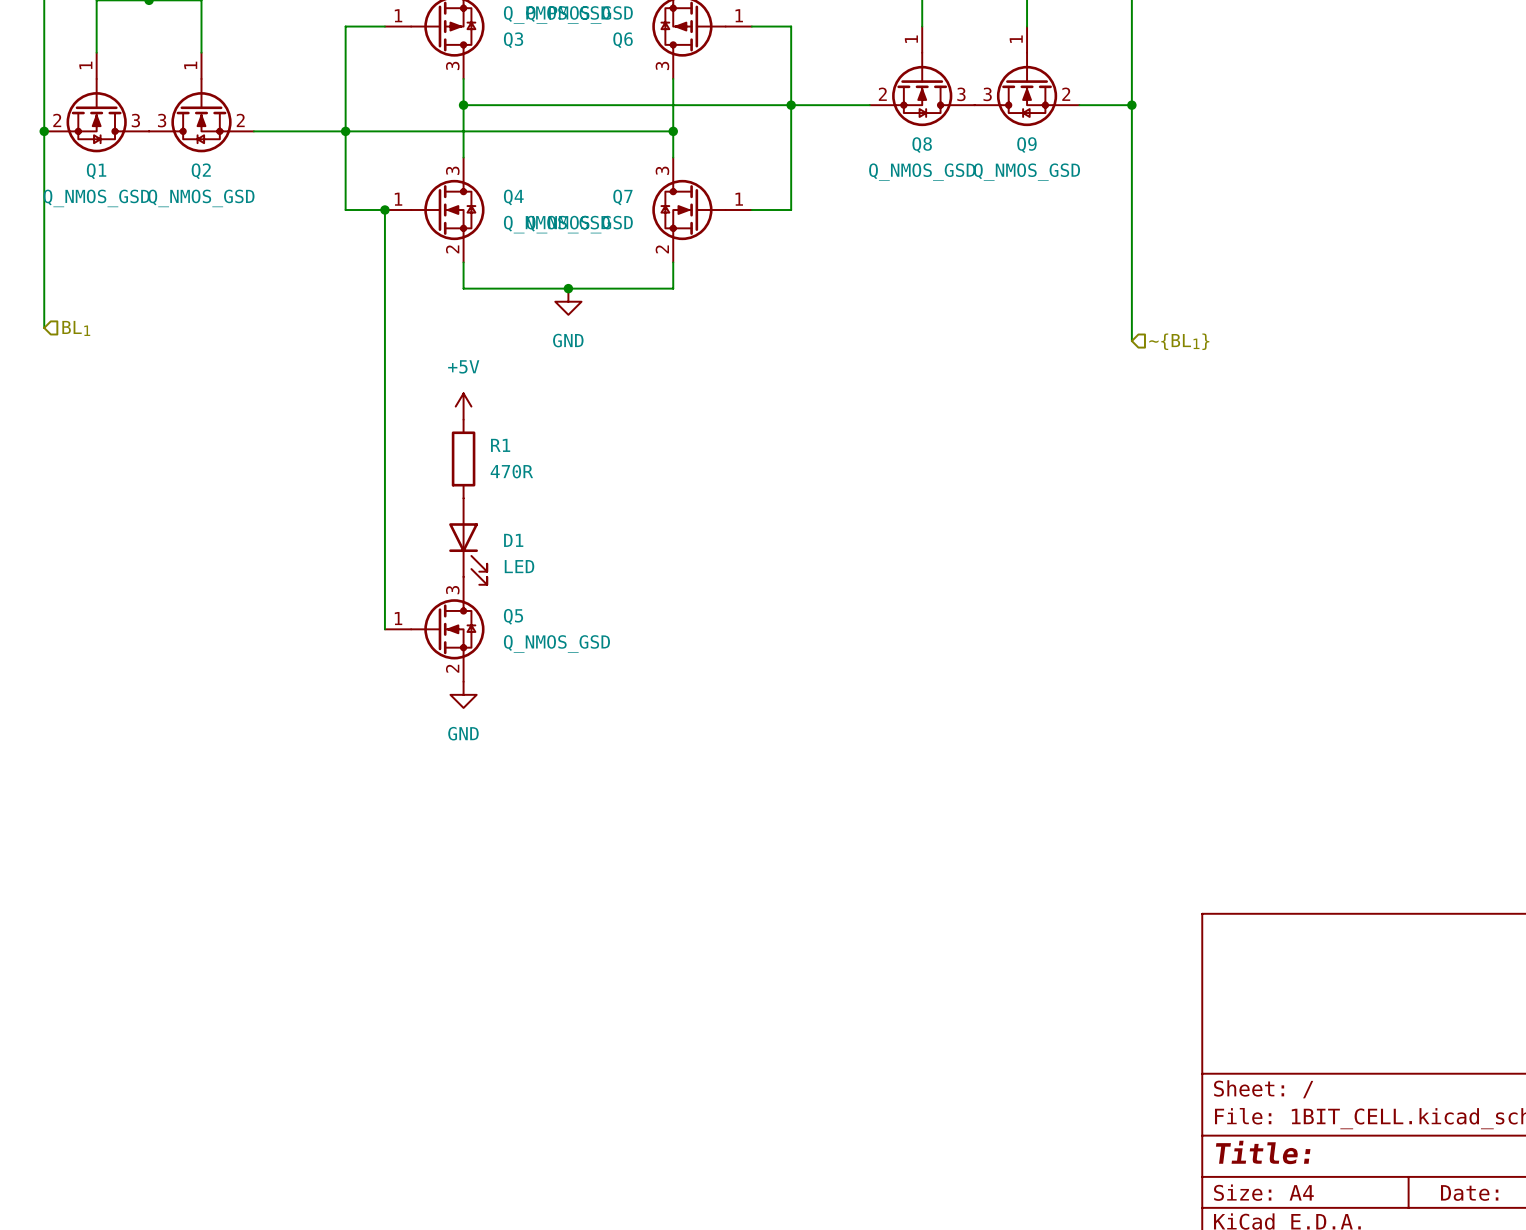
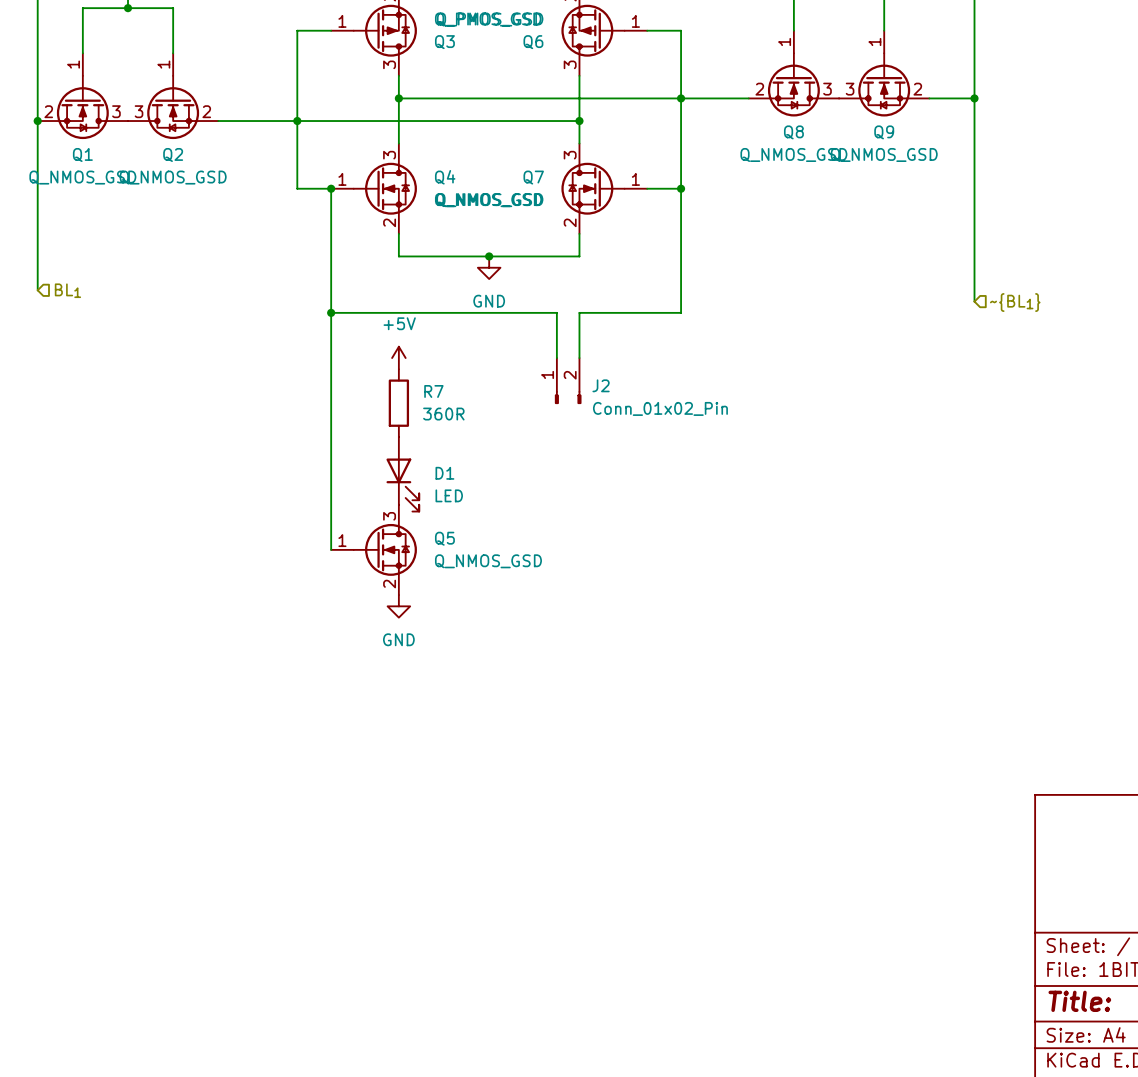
wire: none -> (681, 188) (681, 312) (579, 312) (579, 358)
junction: none -> (681, 188)
wire: none -> (331, 312) (556, 312) (556, 358)
junction: none -> (331, 312)
J2: none -> Conn_01x02_Pin (568, 380)
R1 name: R1 (500, 445) -> R7 (433, 391)
R1 value: 470R (511, 471) -> 360R (443, 414)

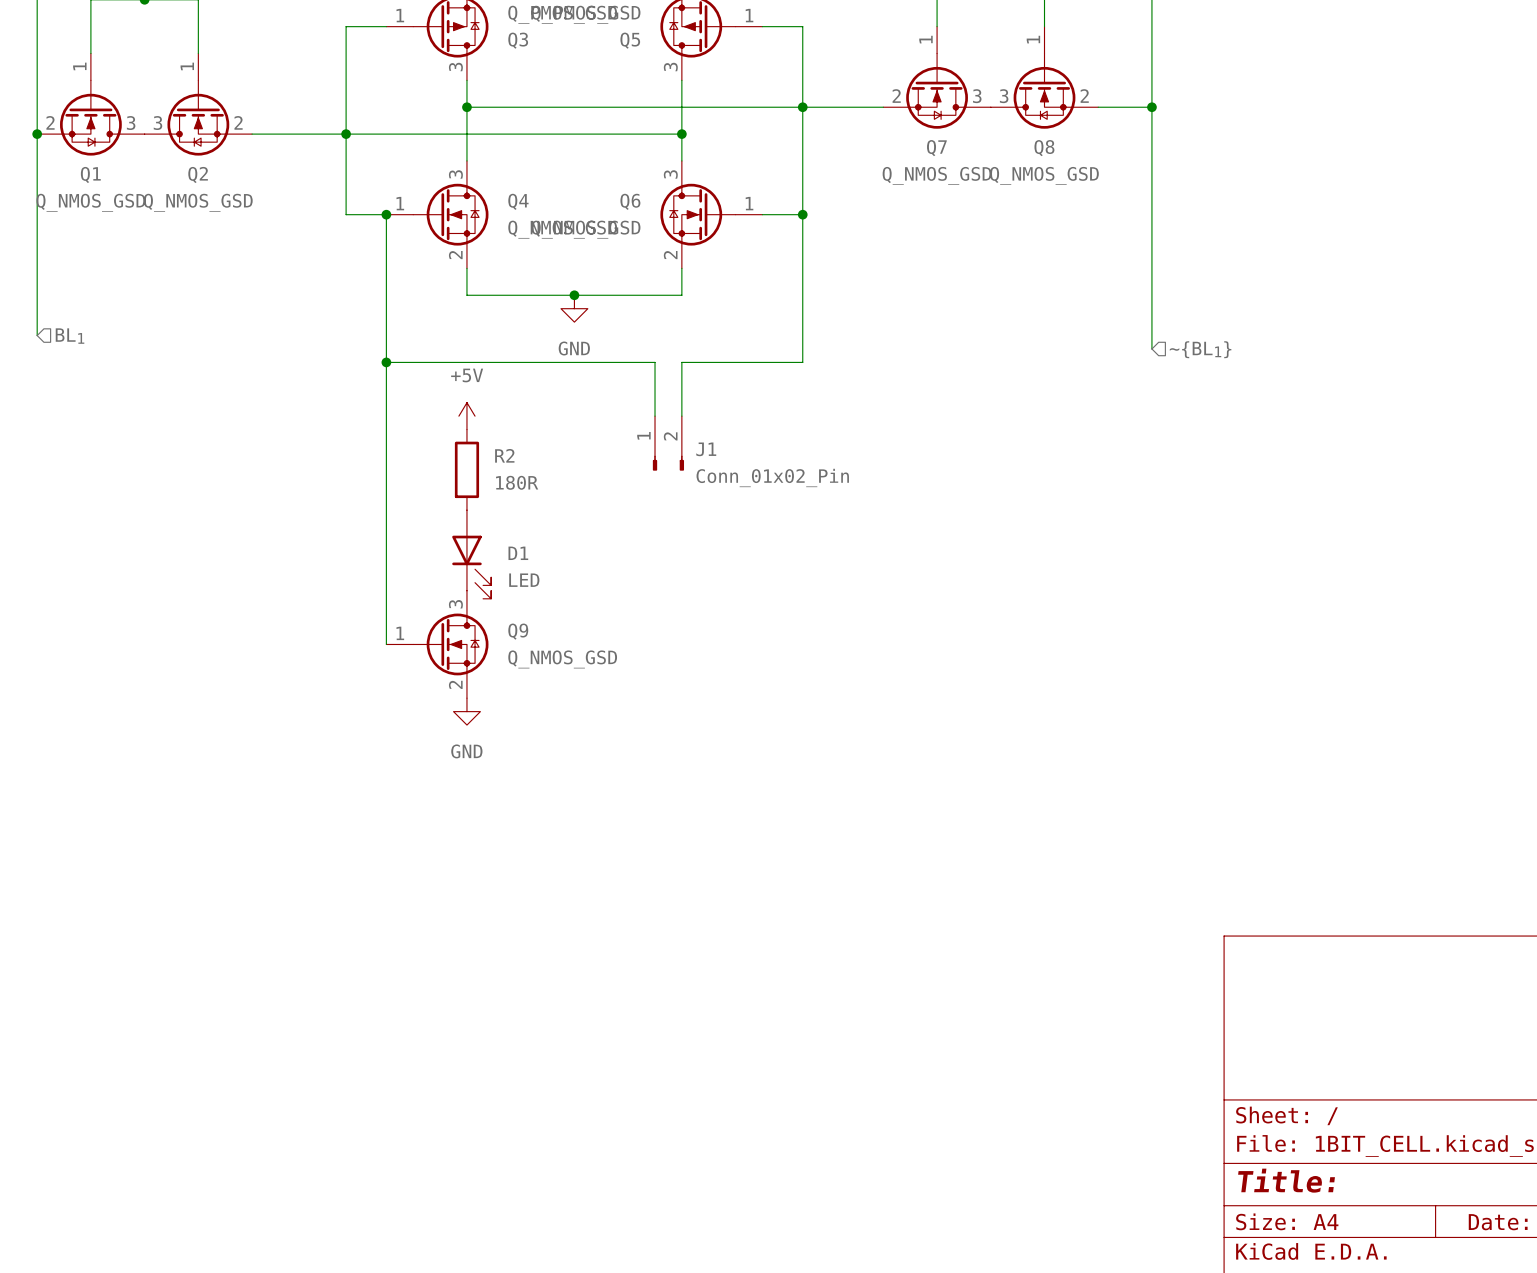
Q6 name: Q6 (533, 42) -> Q5 (630, 40)
Q8 name: Q8 (793, 132) -> Q7 (936, 148)
Q9 name: Q9 (884, 132) -> Q8 (1044, 148)
Q7 name: Q7 (533, 177) -> Q6 (630, 201)
J2 name: J2 (601, 385) -> J1 (706, 449)
R7 name: R7 (433, 391) -> R2 (504, 455)
R7 value: 360R (443, 414) -> 180R (517, 482)
Q5 name: Q5 (444, 538) -> Q9 (518, 631)

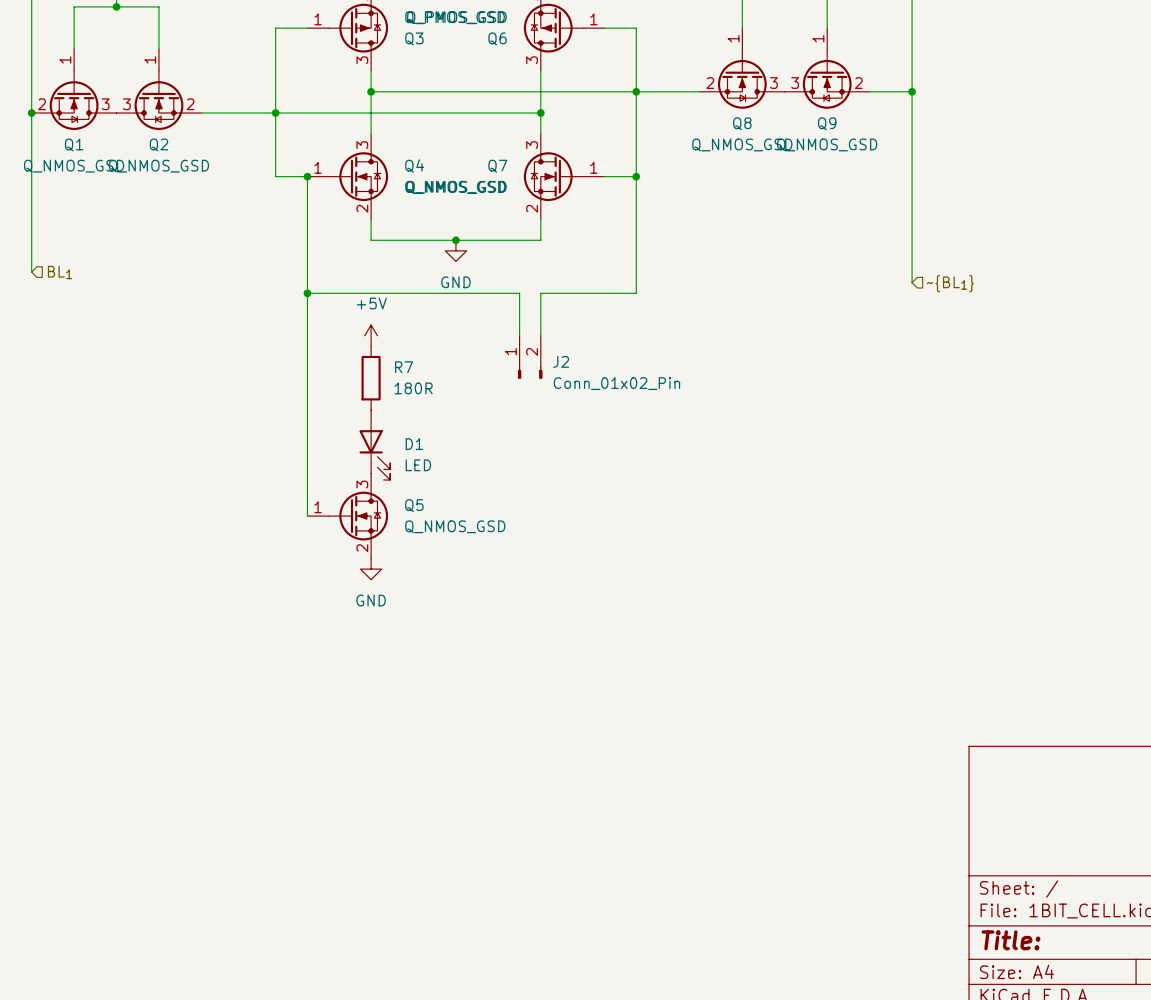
Q5 name: Q5 (630, 40) -> Q6 (497, 38)
Q7 name: Q7 (936, 148) -> Q8 (742, 123)
Q8 name: Q8 (1044, 148) -> Q9 (827, 123)
Q6 name: Q6 (630, 201) -> Q7 (497, 166)
J1 name: J1 (706, 449) -> J2 (561, 361)
R2 name: R2 (504, 455) -> R7 (404, 367)
Q9 name: Q9 (518, 631) -> Q5 (414, 505)

